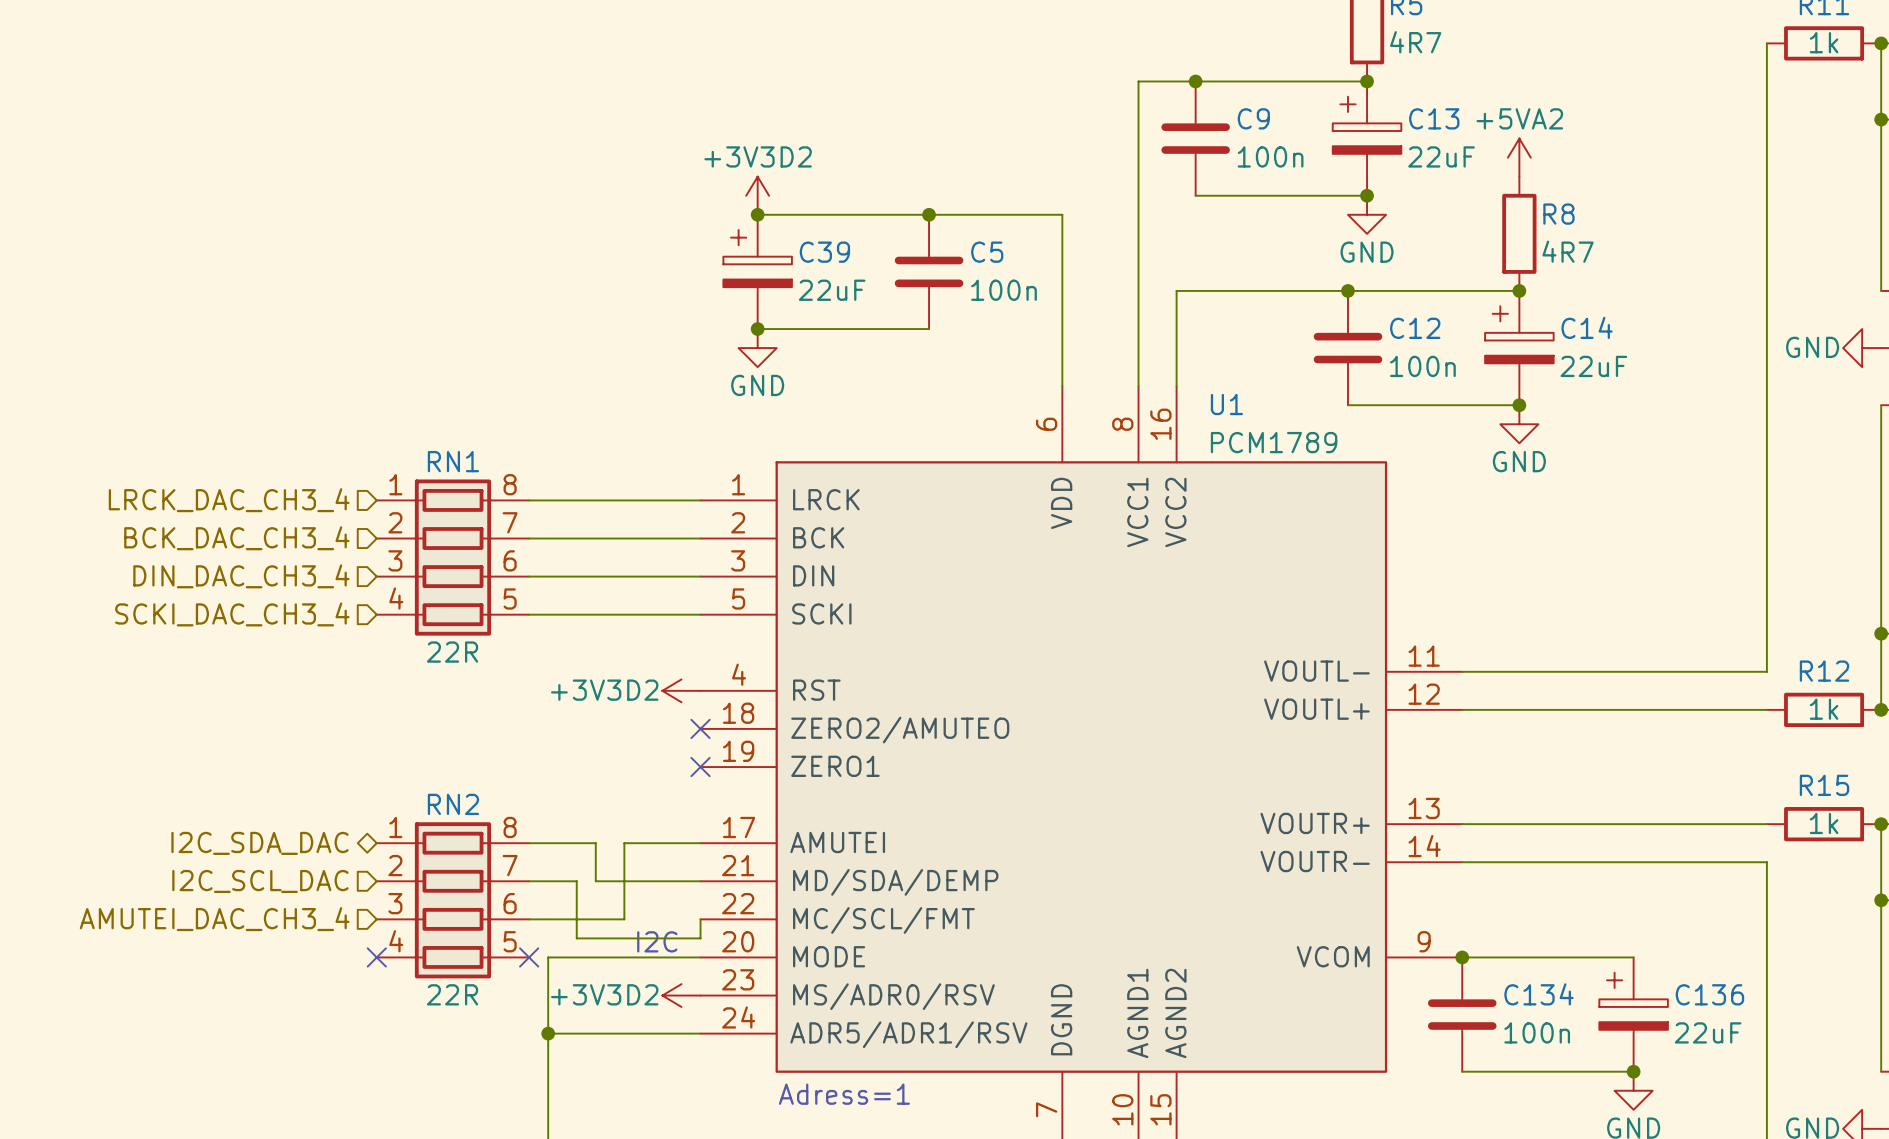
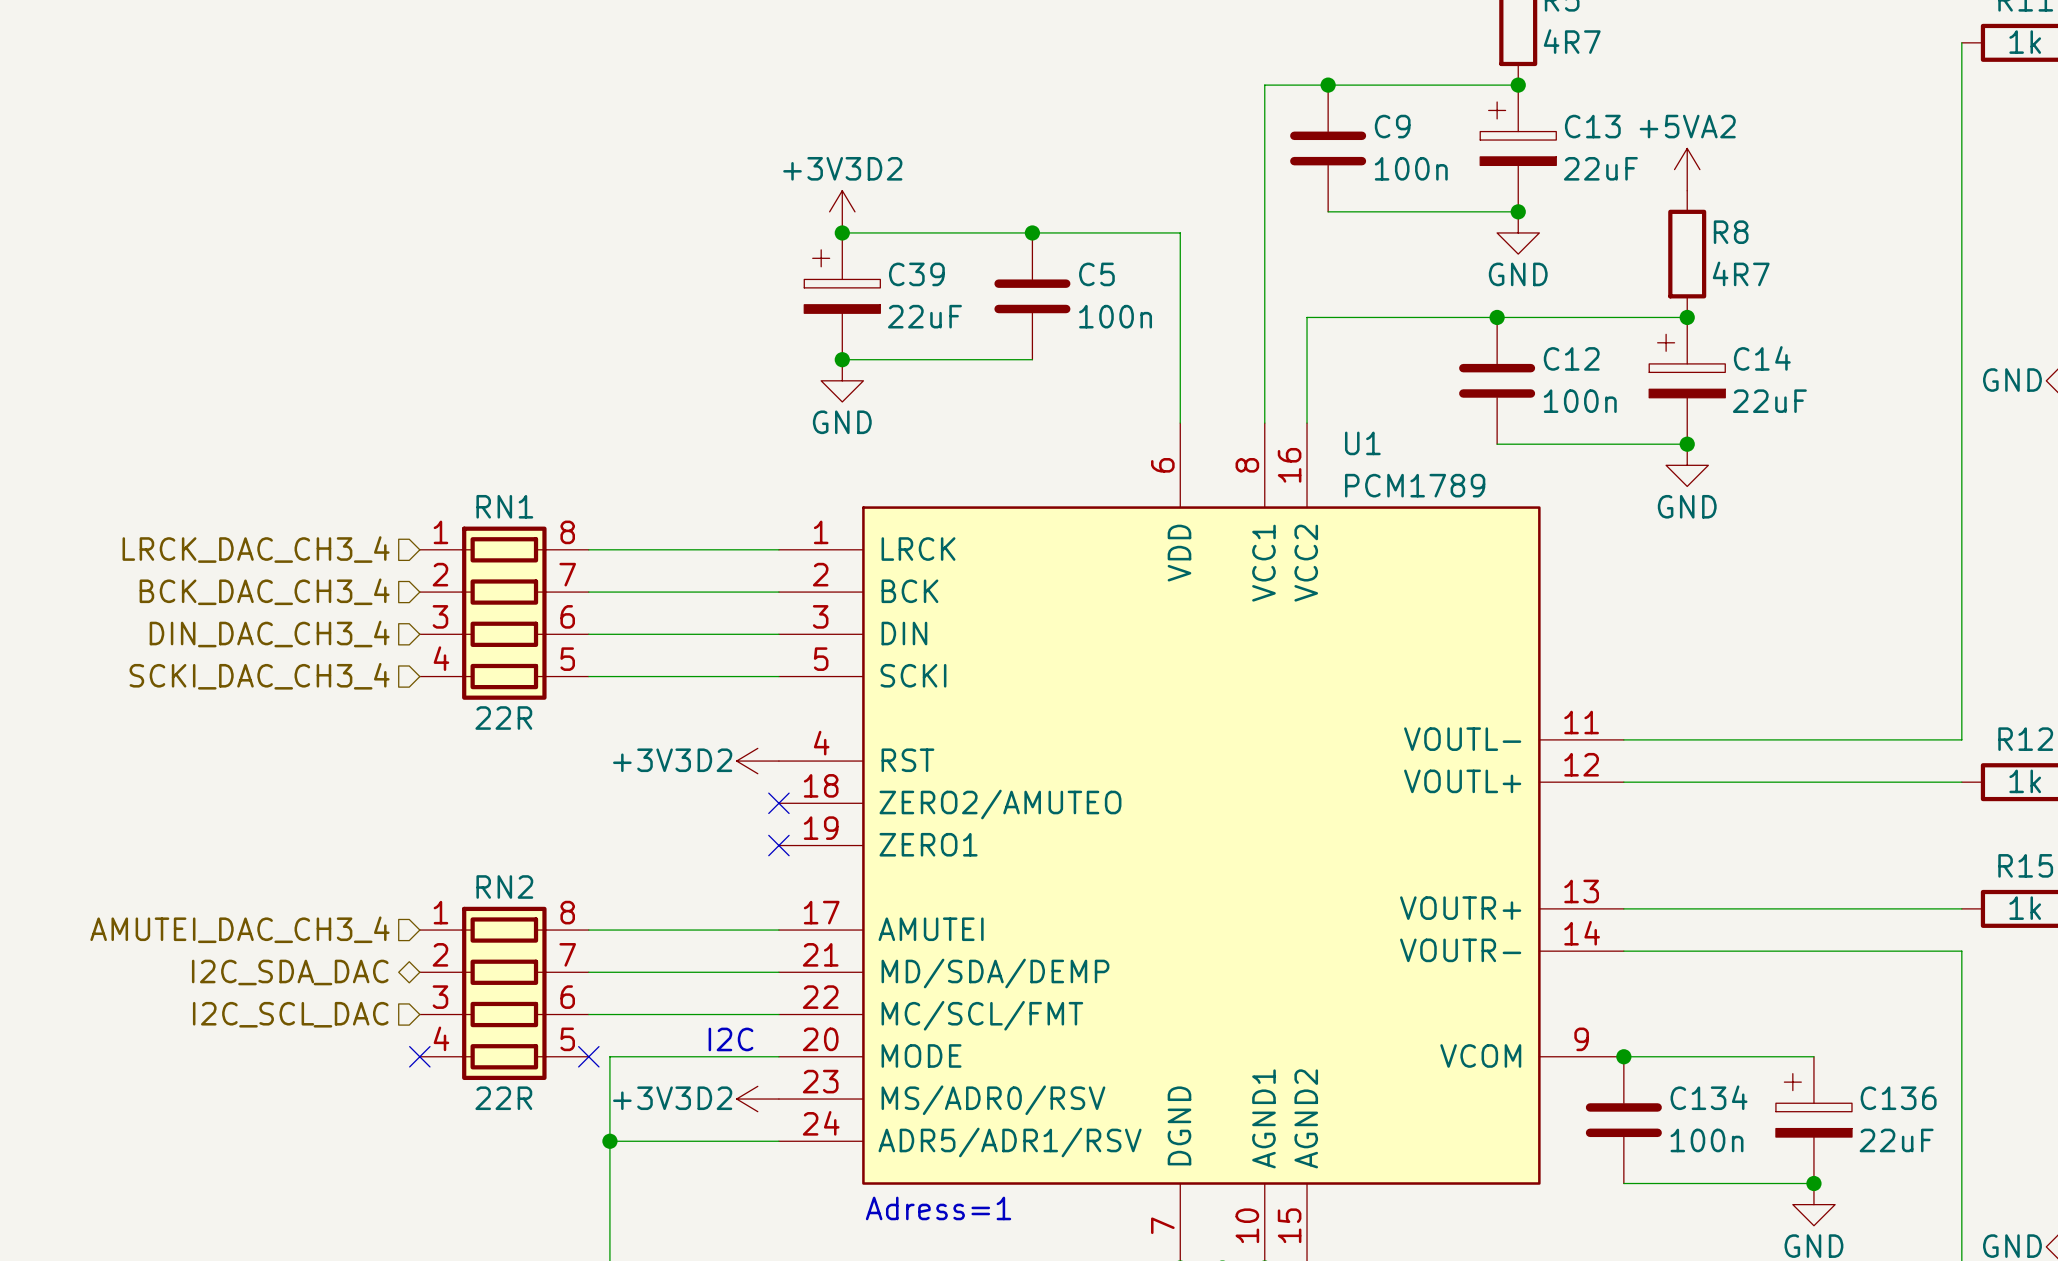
hierarchical label shape: bidirectional (259, 843) -> input (239, 929)
hierarchical label: I2C_SDA_DAC (259, 843) -> AMUTEI_DAC_CH3_4 (239, 929)
wire: (595, 843) (595, 881) -> (641, 972) (662, 972)
wire: (624, 843) (624, 919) -> (694, 930) (662, 930)
hierarchical label shape: input (260, 881) -> bidirectional (290, 972)
hierarchical label: I2C_SCL_DAC (260, 881) -> I2C_SDA_DAC (290, 972)
wire: (576, 881) (576, 938) (700, 938) (700, 919) -> (694, 1014) (778, 1014)
hierarchical label: AMUTEI_DAC_CH3_4 (214, 919) -> I2C_SCL_DAC (290, 1014)

